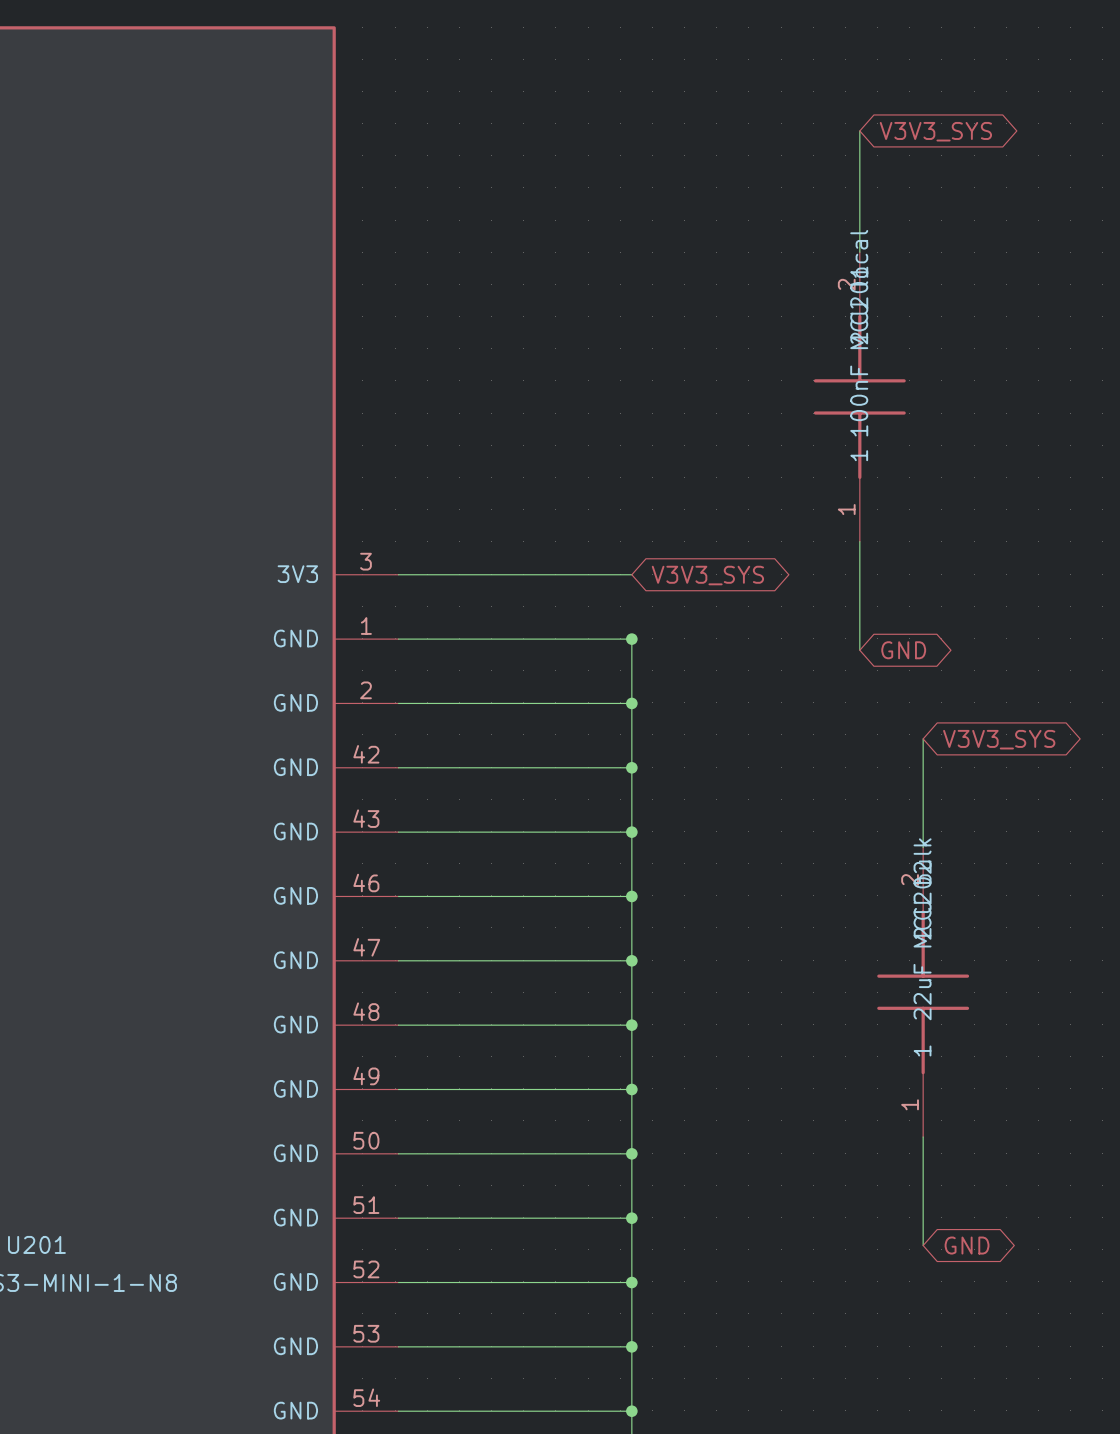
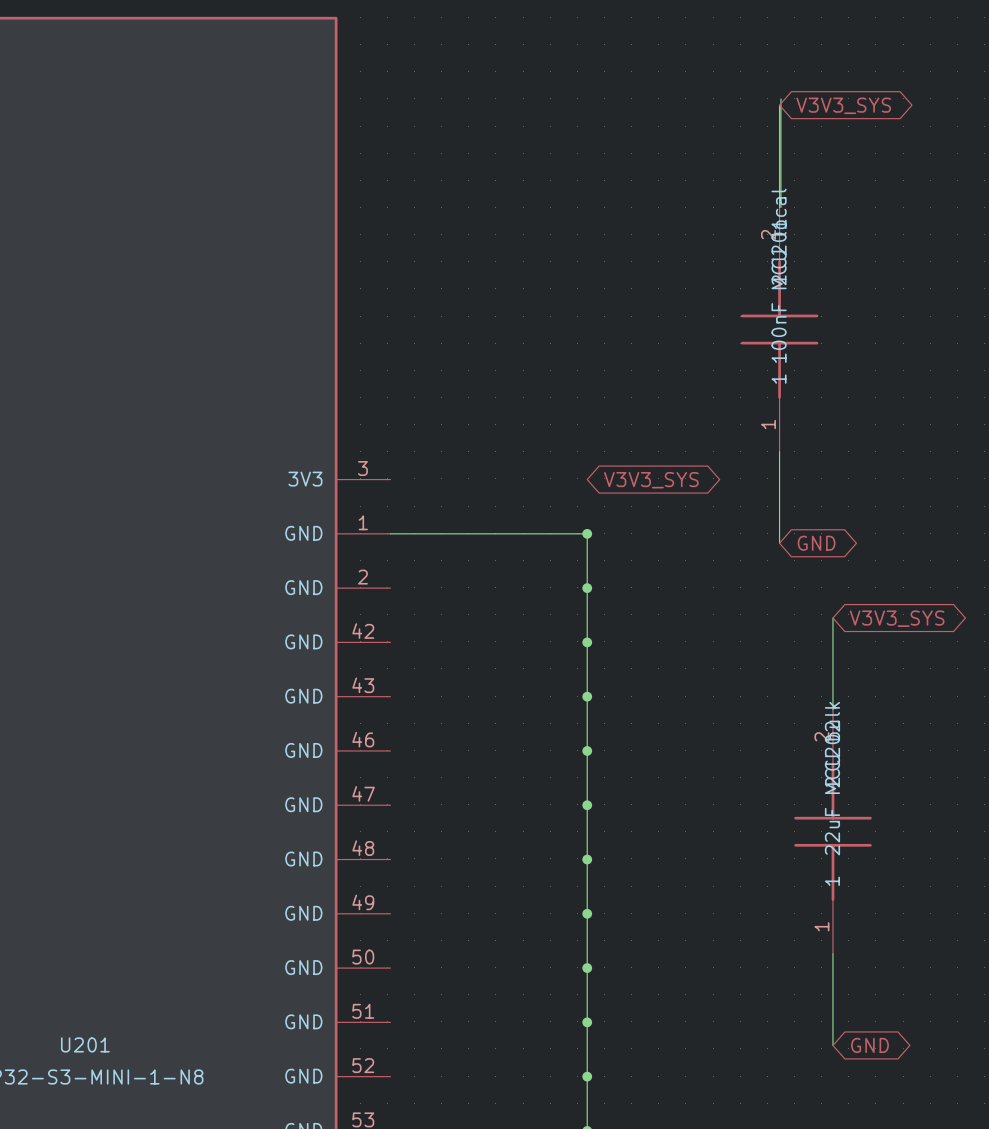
wire: none -> (780, 98) (780, 207)
wire: (398, 574) (631, 574) -> none
wire: (398, 703) (631, 703) -> none
wire: (398, 767) (631, 767) -> none
wire: (398, 832) (631, 832) -> none
wire: (398, 896) (631, 896) -> none
wire: (398, 960) (631, 960) -> none
wire: (398, 1025) (631, 1025) -> none
wire: (398, 1089) (631, 1089) -> none
wire: (398, 1153) (631, 1153) -> none
wire: (398, 1218) (631, 1218) -> none
wire: (398, 1282) (631, 1282) -> none

